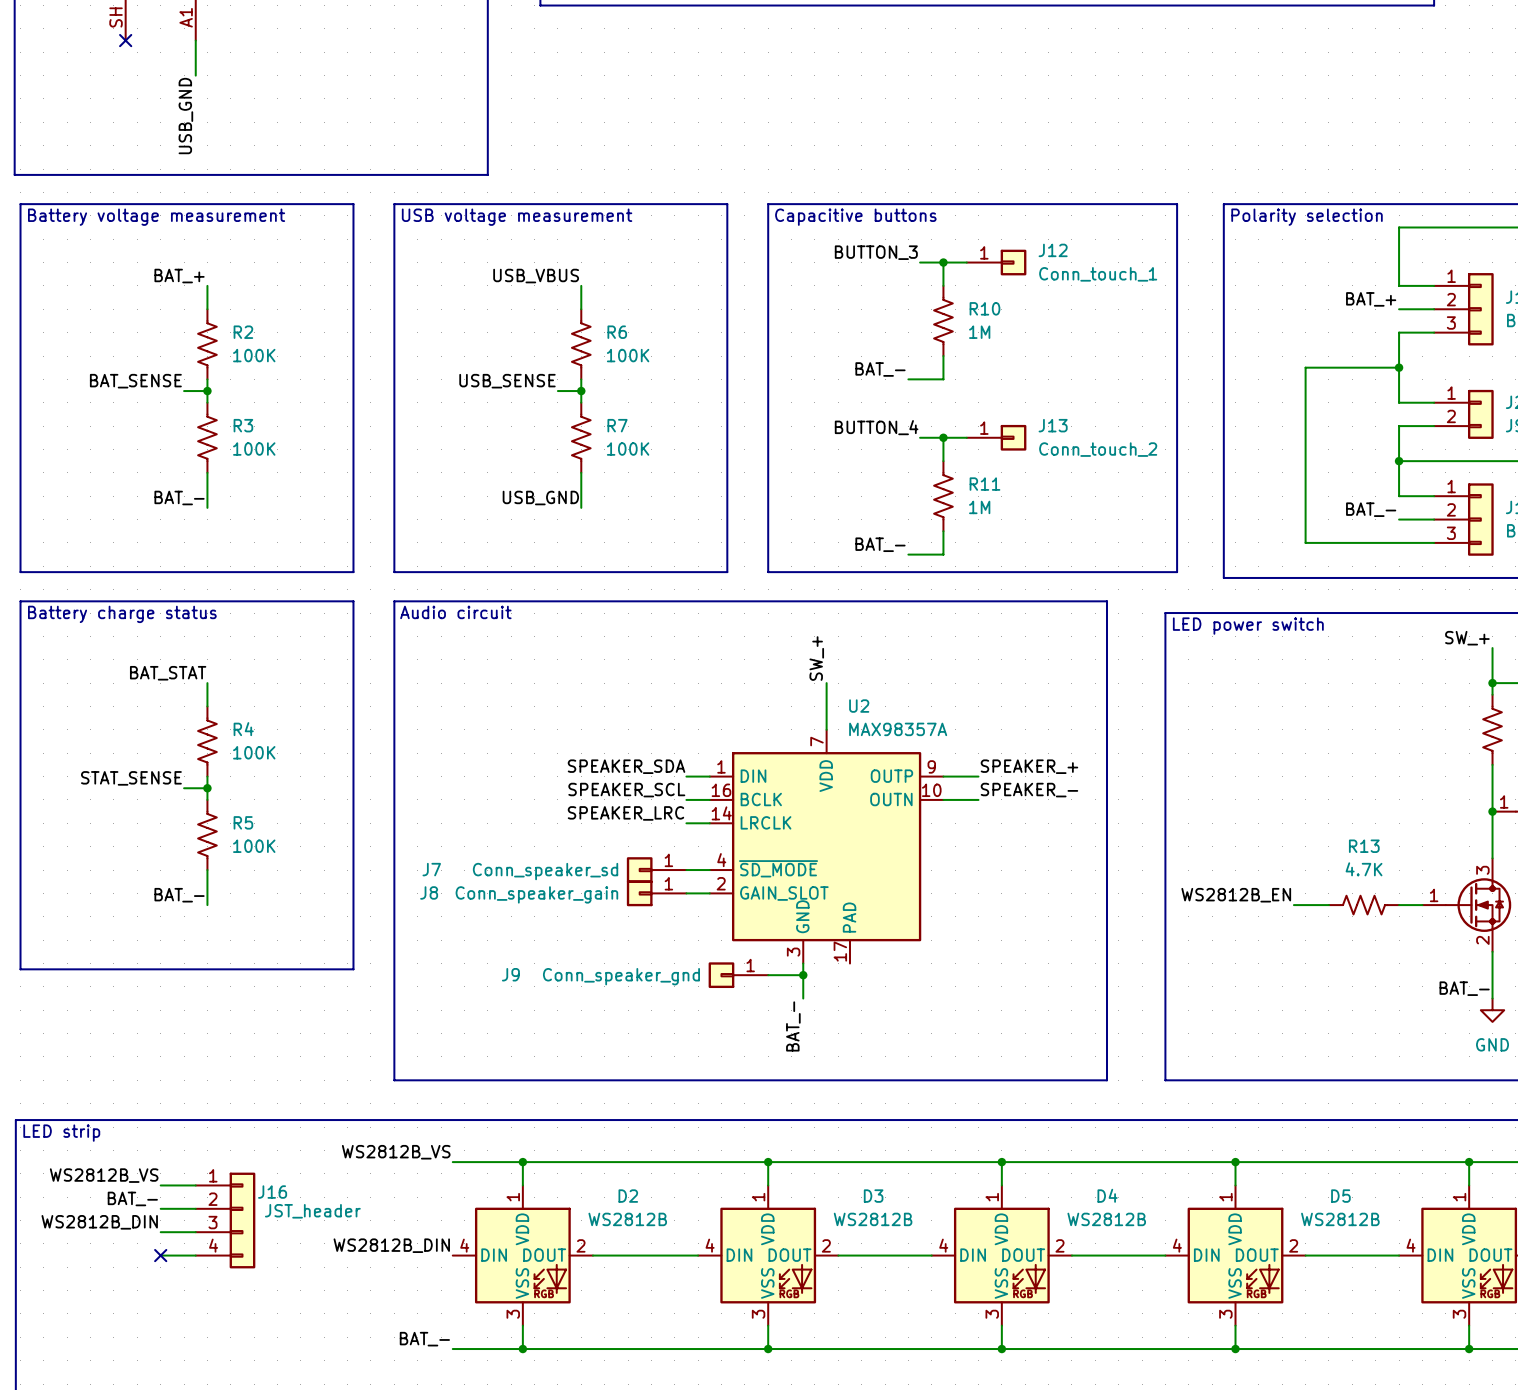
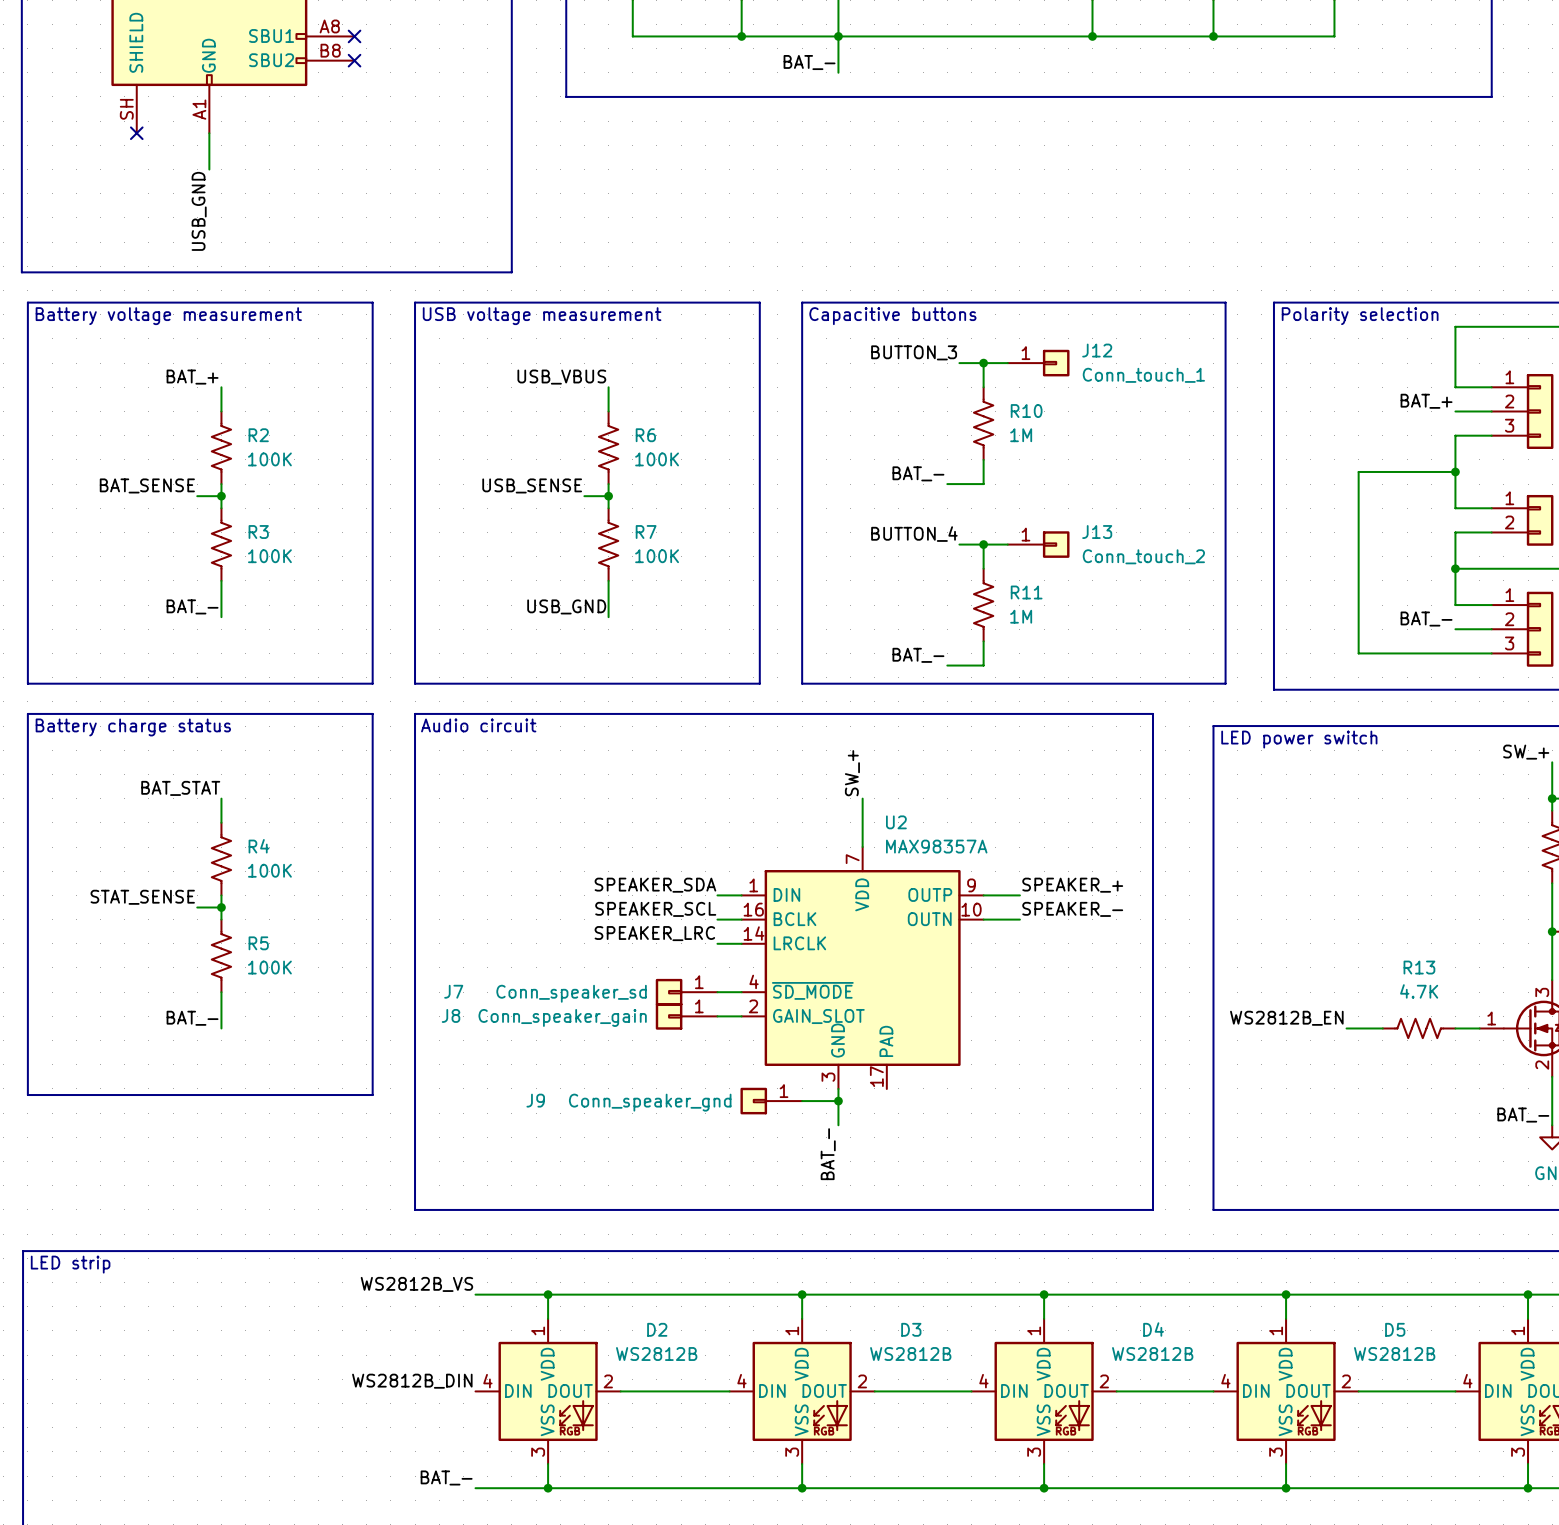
label: WS2812B_VS (104, 1175) -> none
wire: (160, 1185) (195, 1185) -> none
label: BAT_- (132, 1198) -> none
wire: (160, 1208) (195, 1208) -> none
J16: JST_header (225, 1220) -> none
label: WS2812B_DIN (99, 1222) -> none
wire: (160, 1232) (195, 1232) -> none
wire: (160, 1255) (195, 1255) -> none
no-connect mark: (160, 1255) -> none

